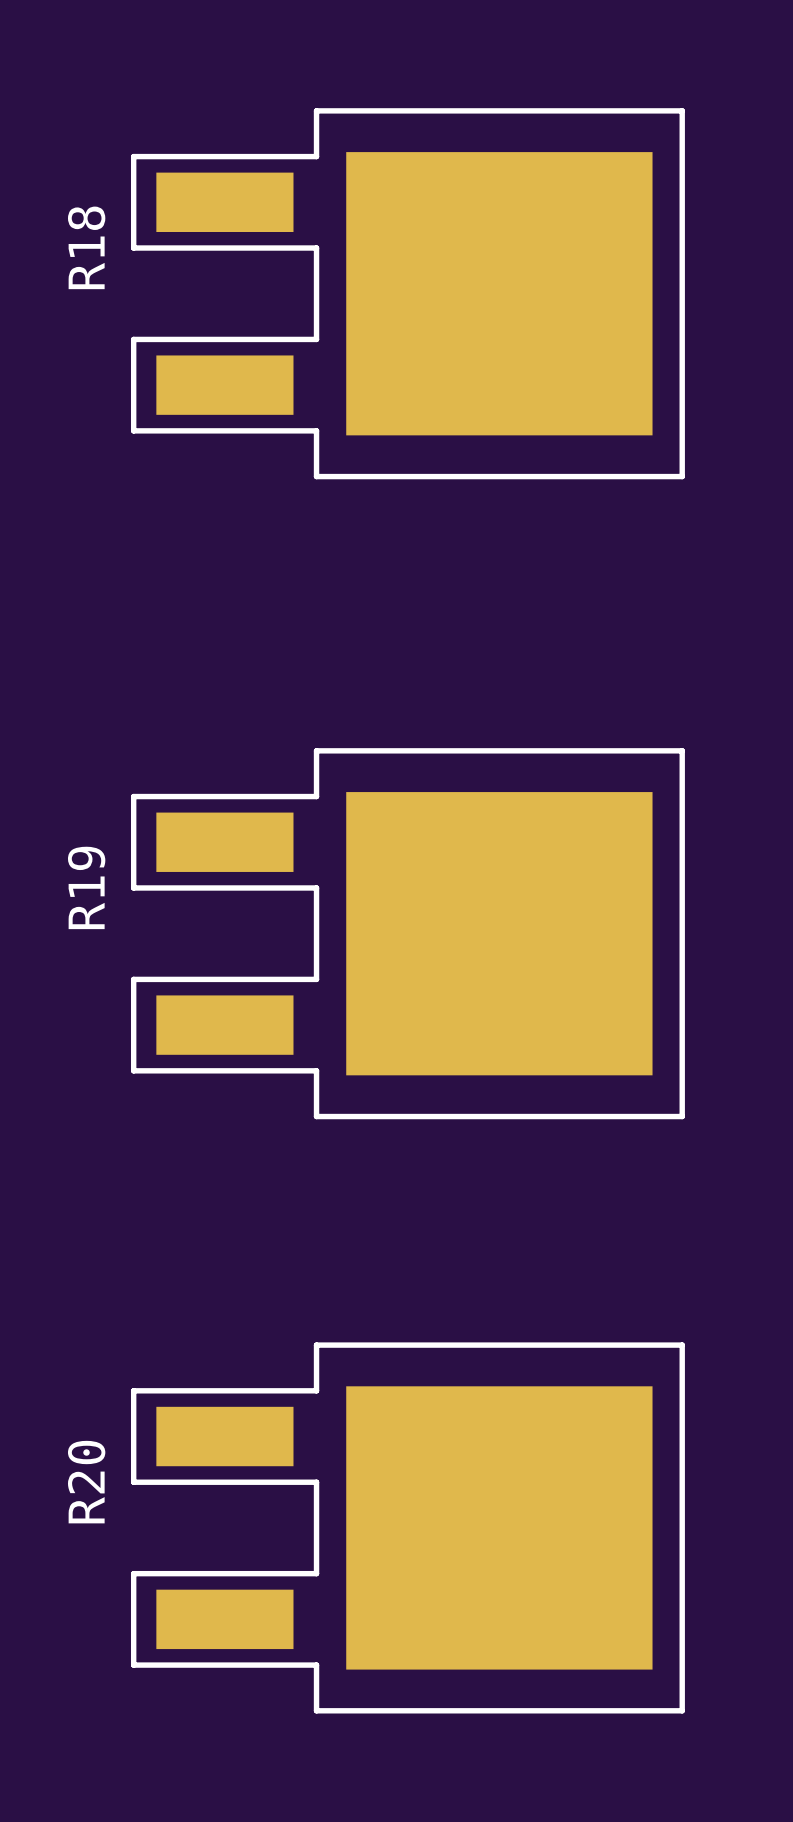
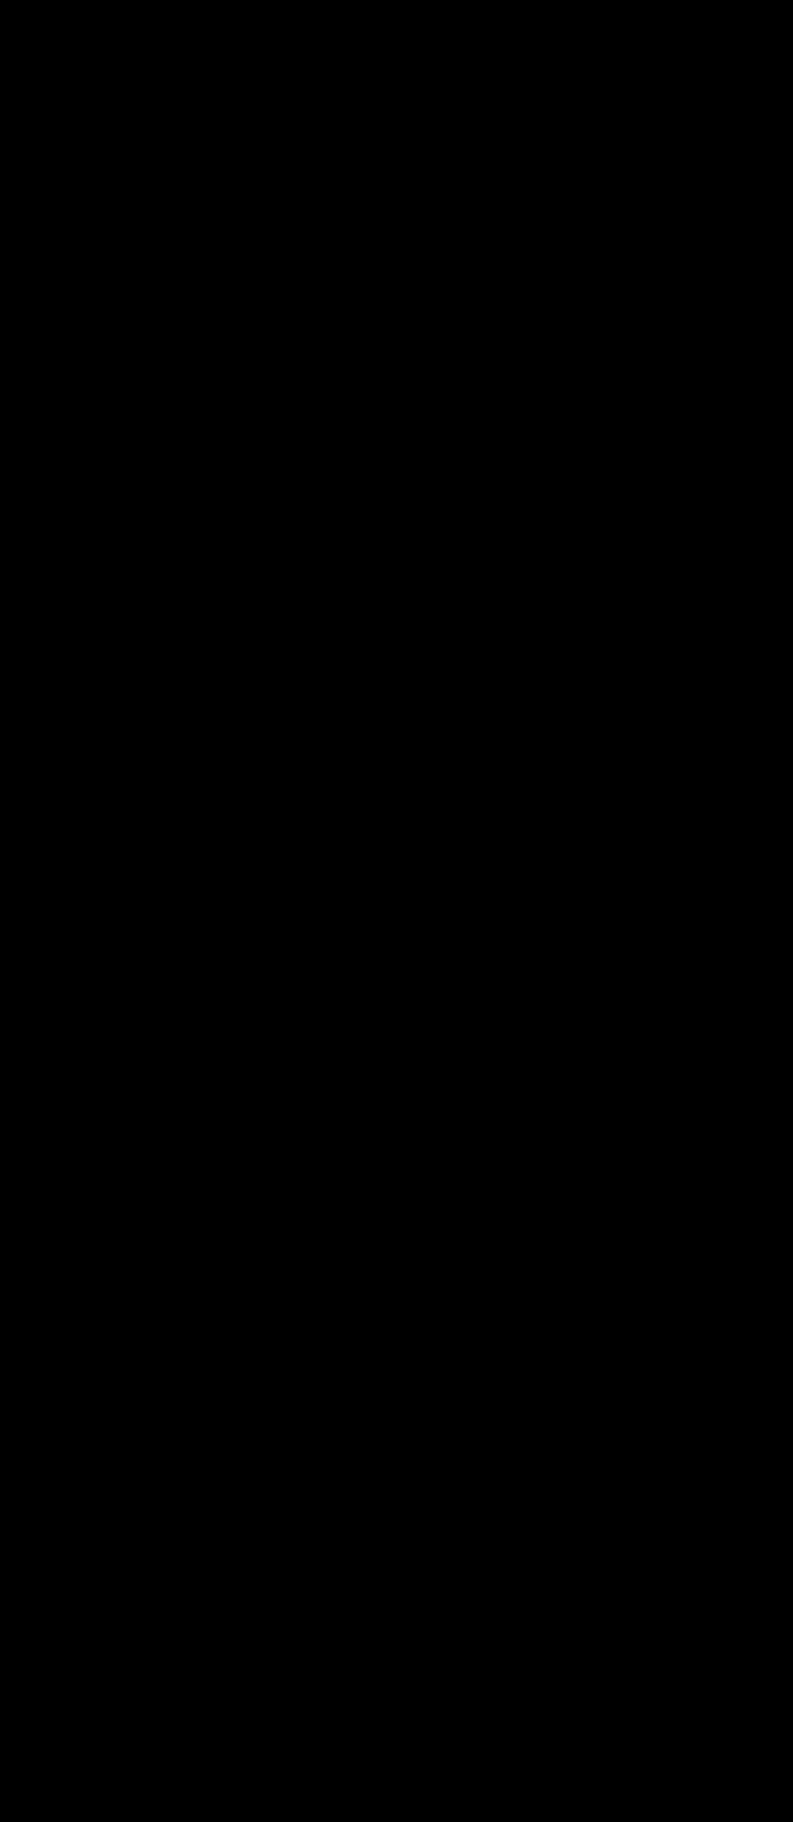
R18: (407, 293) -> none
R19: (407, 933) -> none
R20: (407, 1527) -> none

